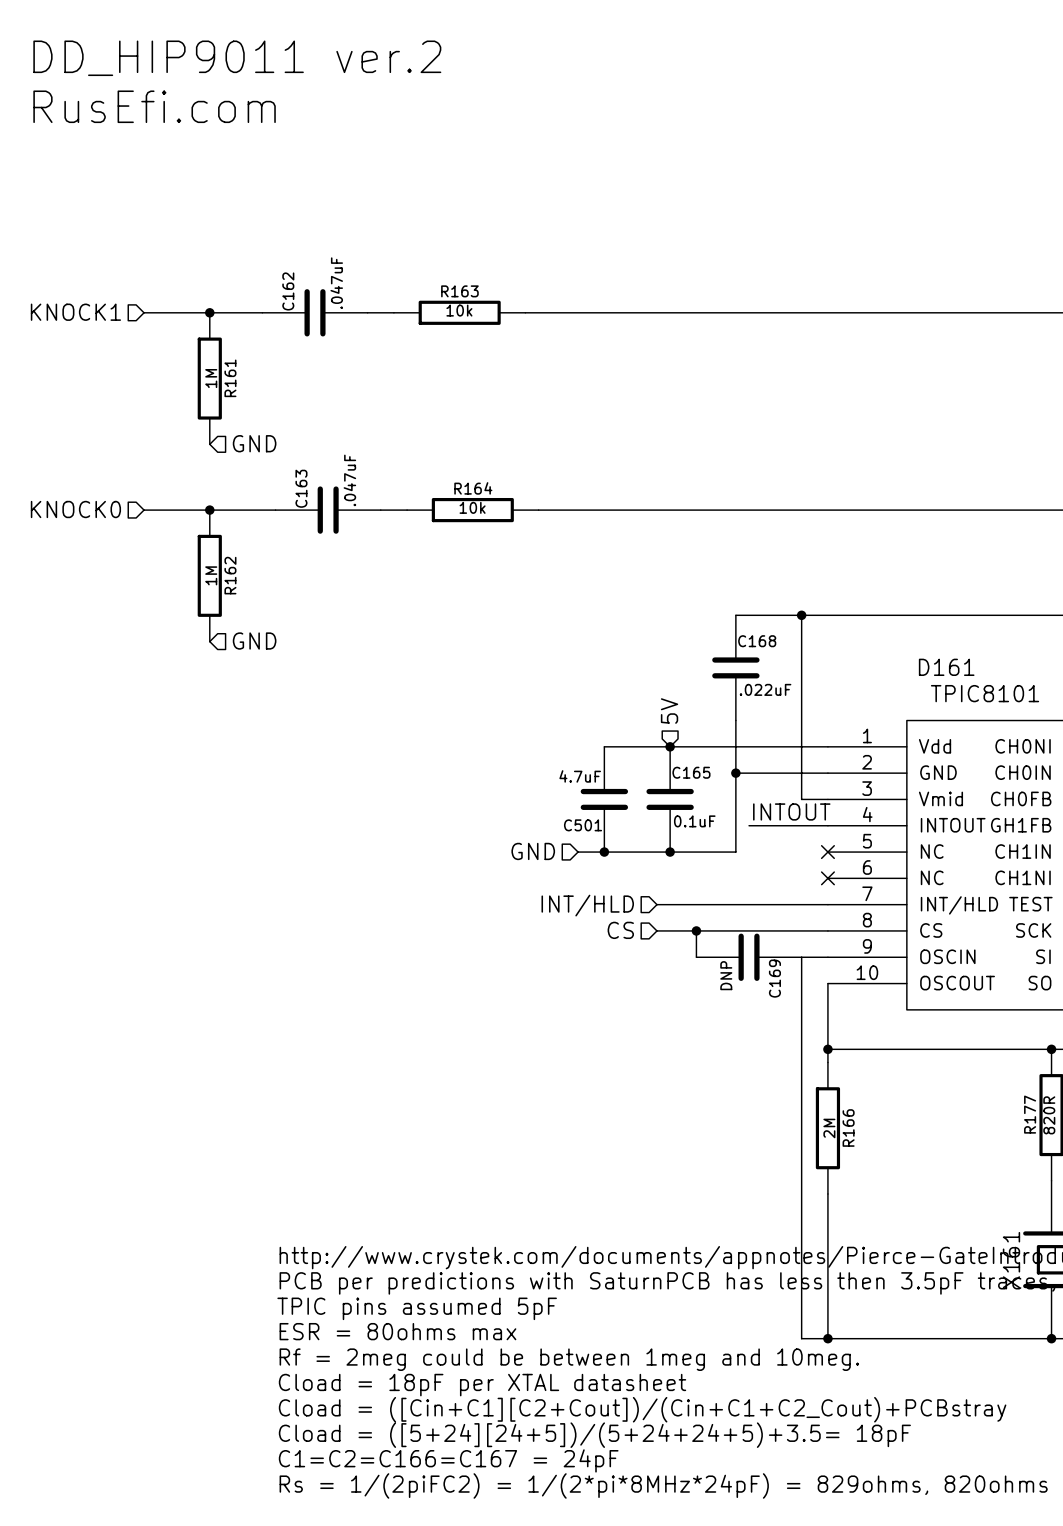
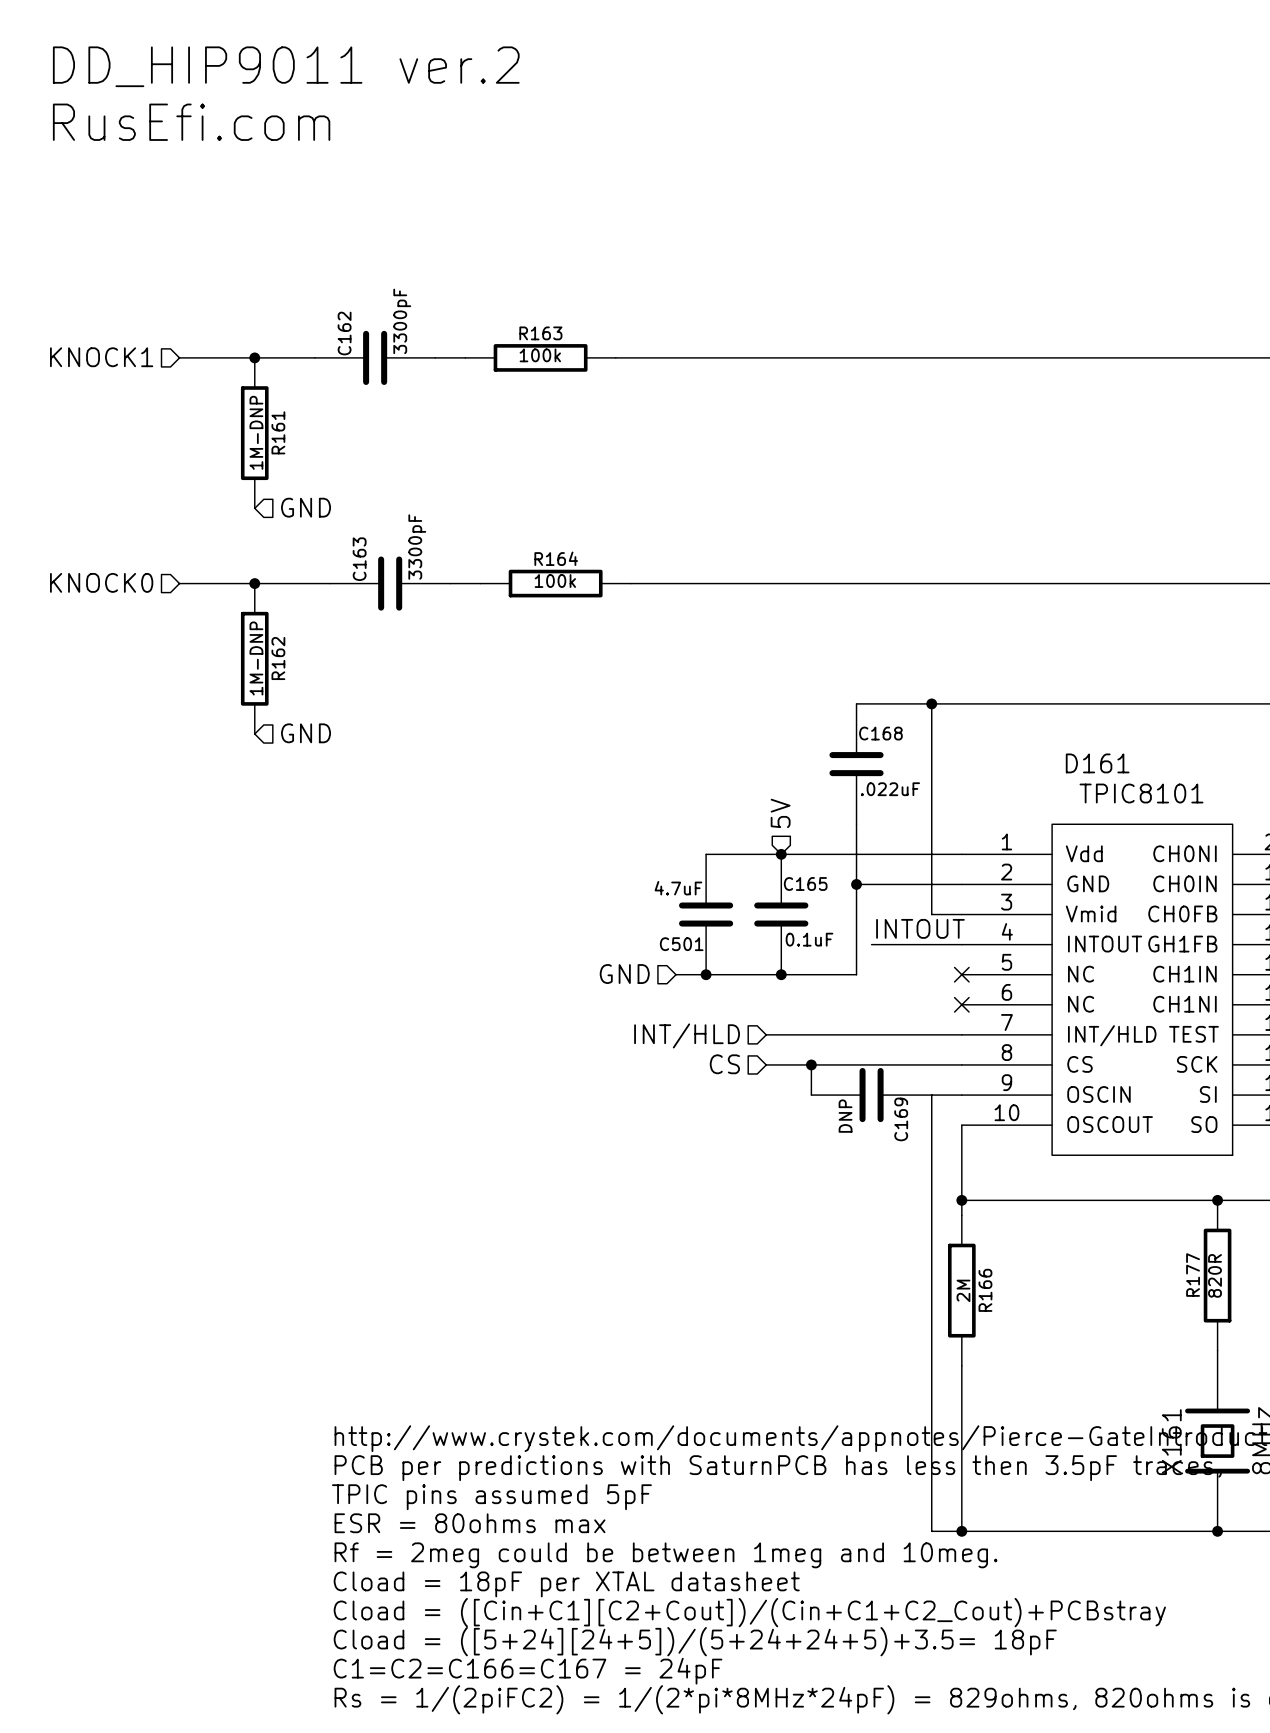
C162 value: .047uF (336, 283) -> 3300pF (402, 321)
R163 value: 10k (459, 310) -> 100k (540, 355)
R161 value: 1M (211, 378) -> 1M-DNP (256, 432)
C163 value: .047uF (349, 480) -> 3300pF (417, 547)
R164 value: 10k (472, 507) -> 100k (555, 581)
R162 value: 1M (211, 575) -> 1M-DNP (256, 658)

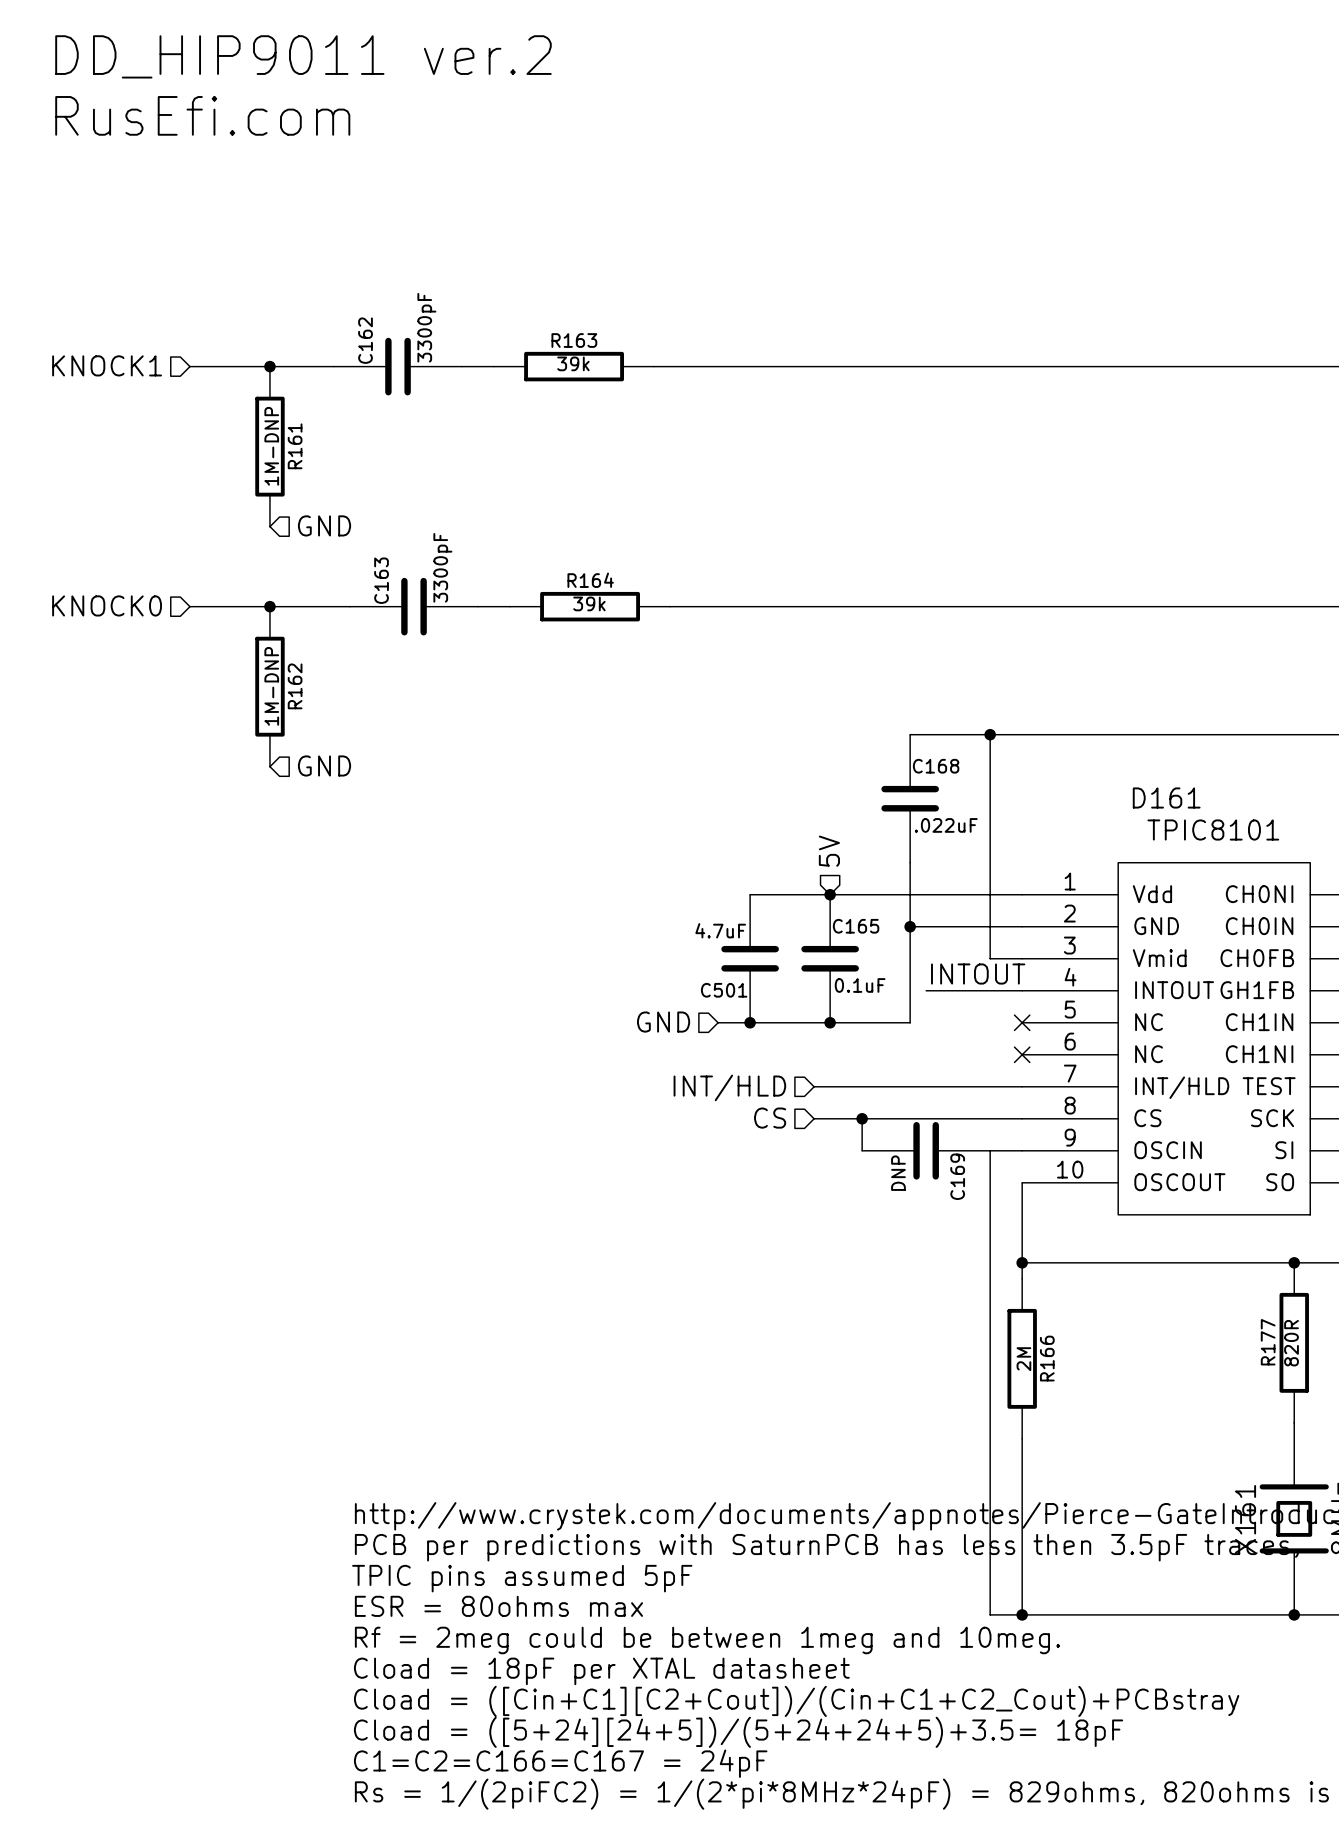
R163 value: 100k (540, 355) -> 39k (573, 363)
R164 value: 100k (555, 581) -> 39k (589, 603)

